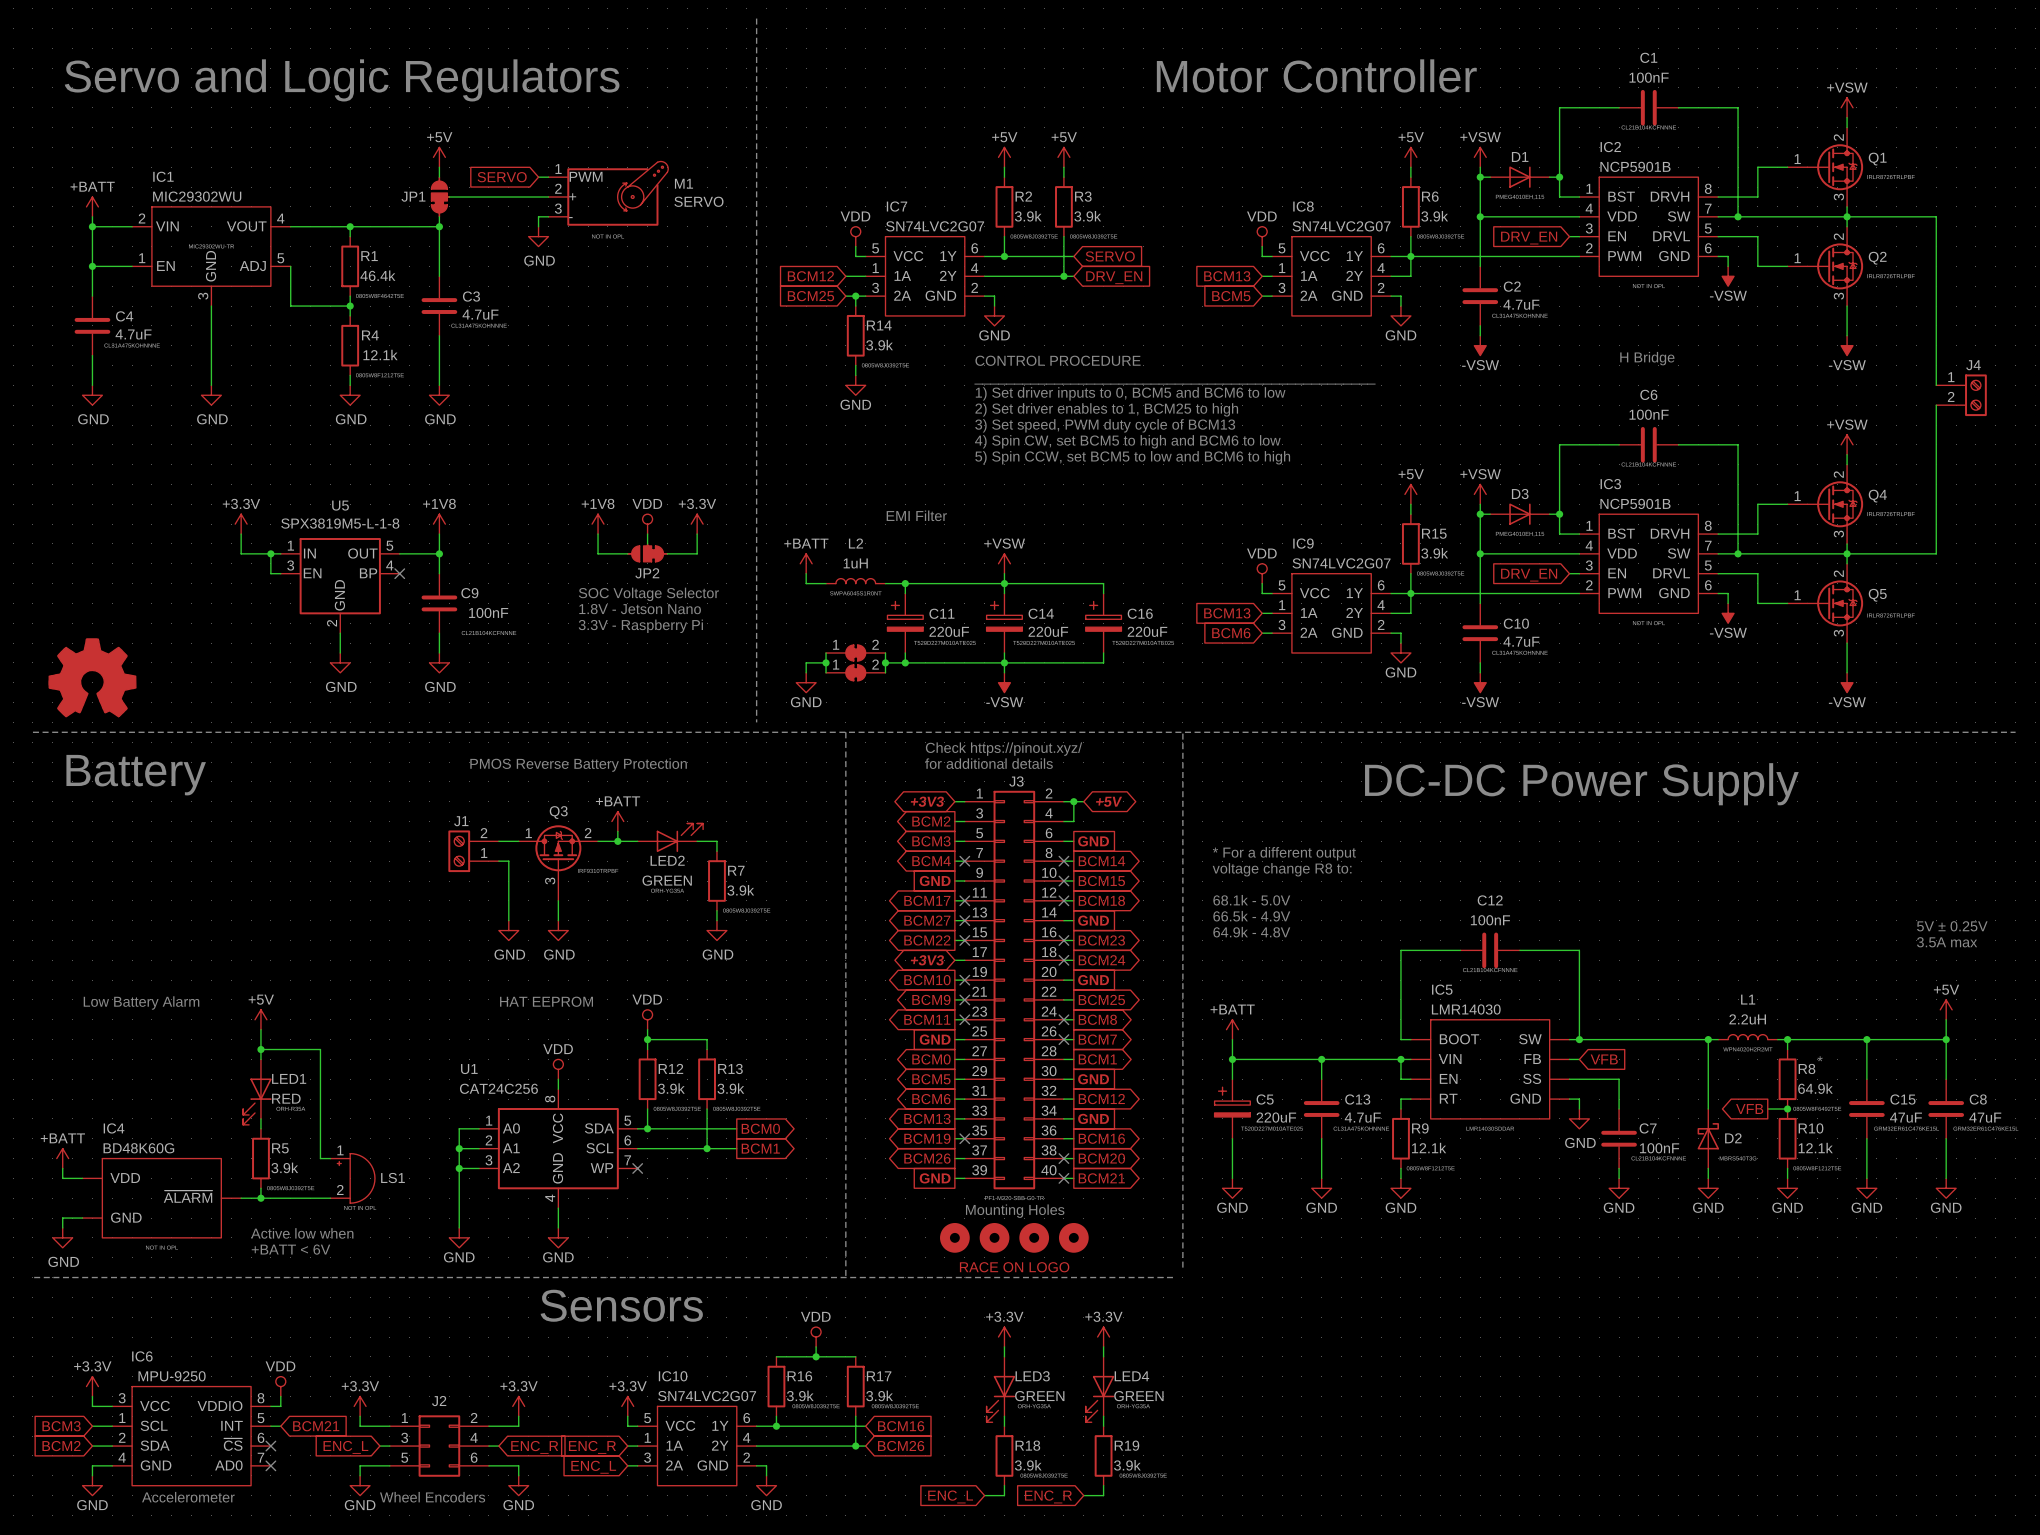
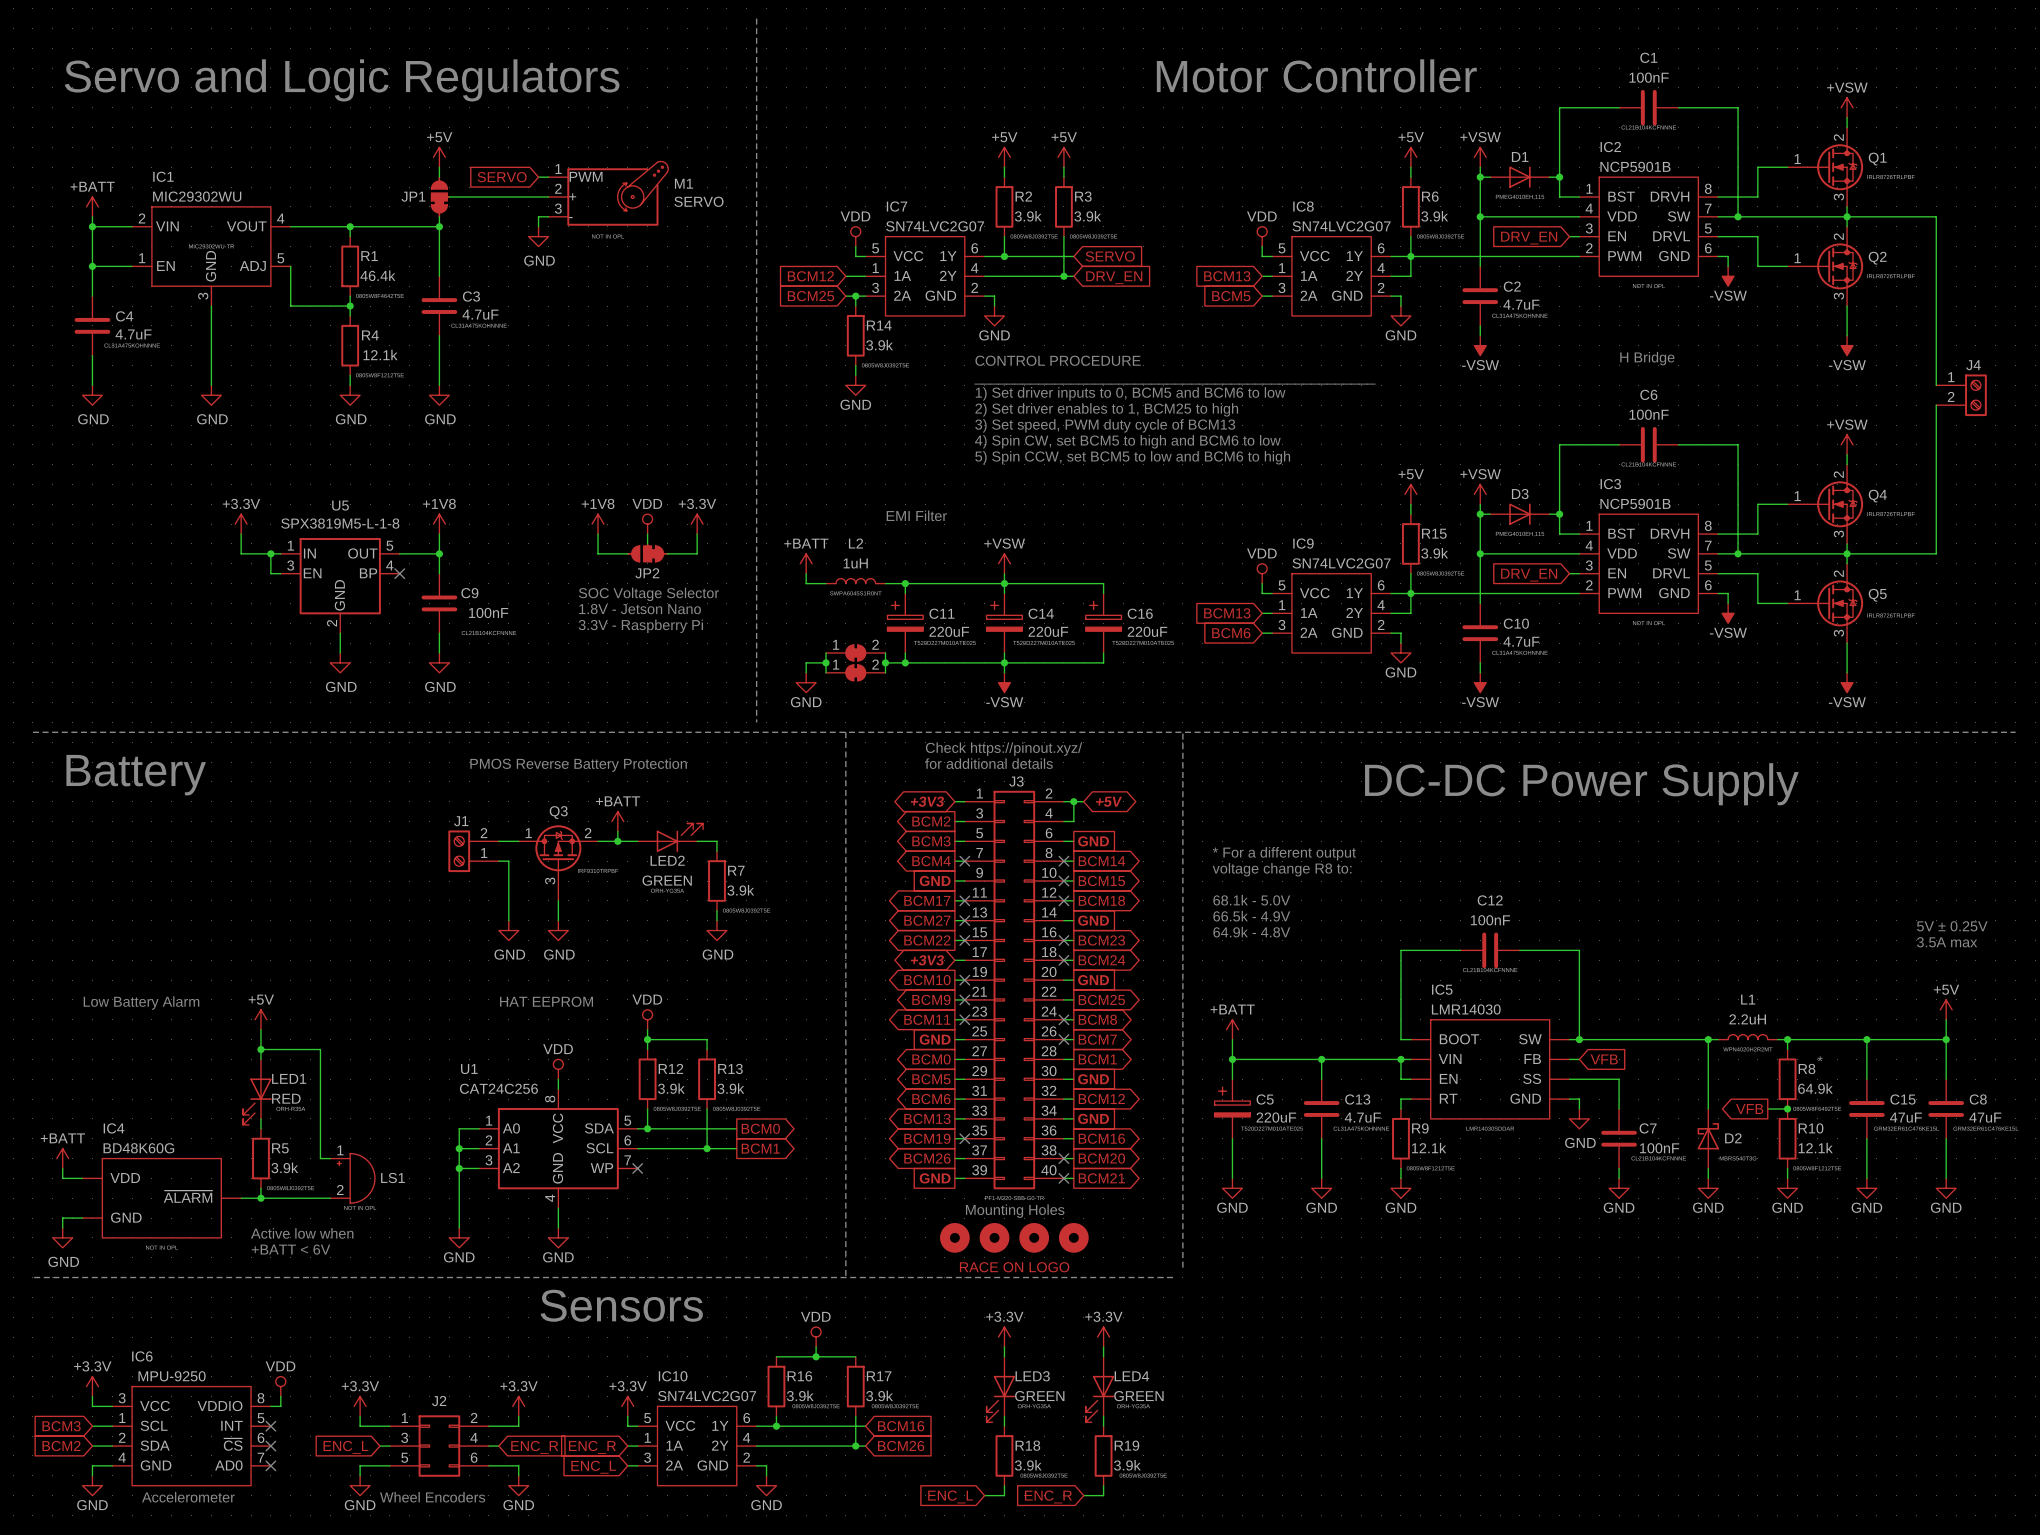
part: (92, 677) -> none
wire: (270, 1426) (280, 1426) -> none
no-connect mark: none -> (270, 1426)
global label: BCM21 (316, 1426) -> none

